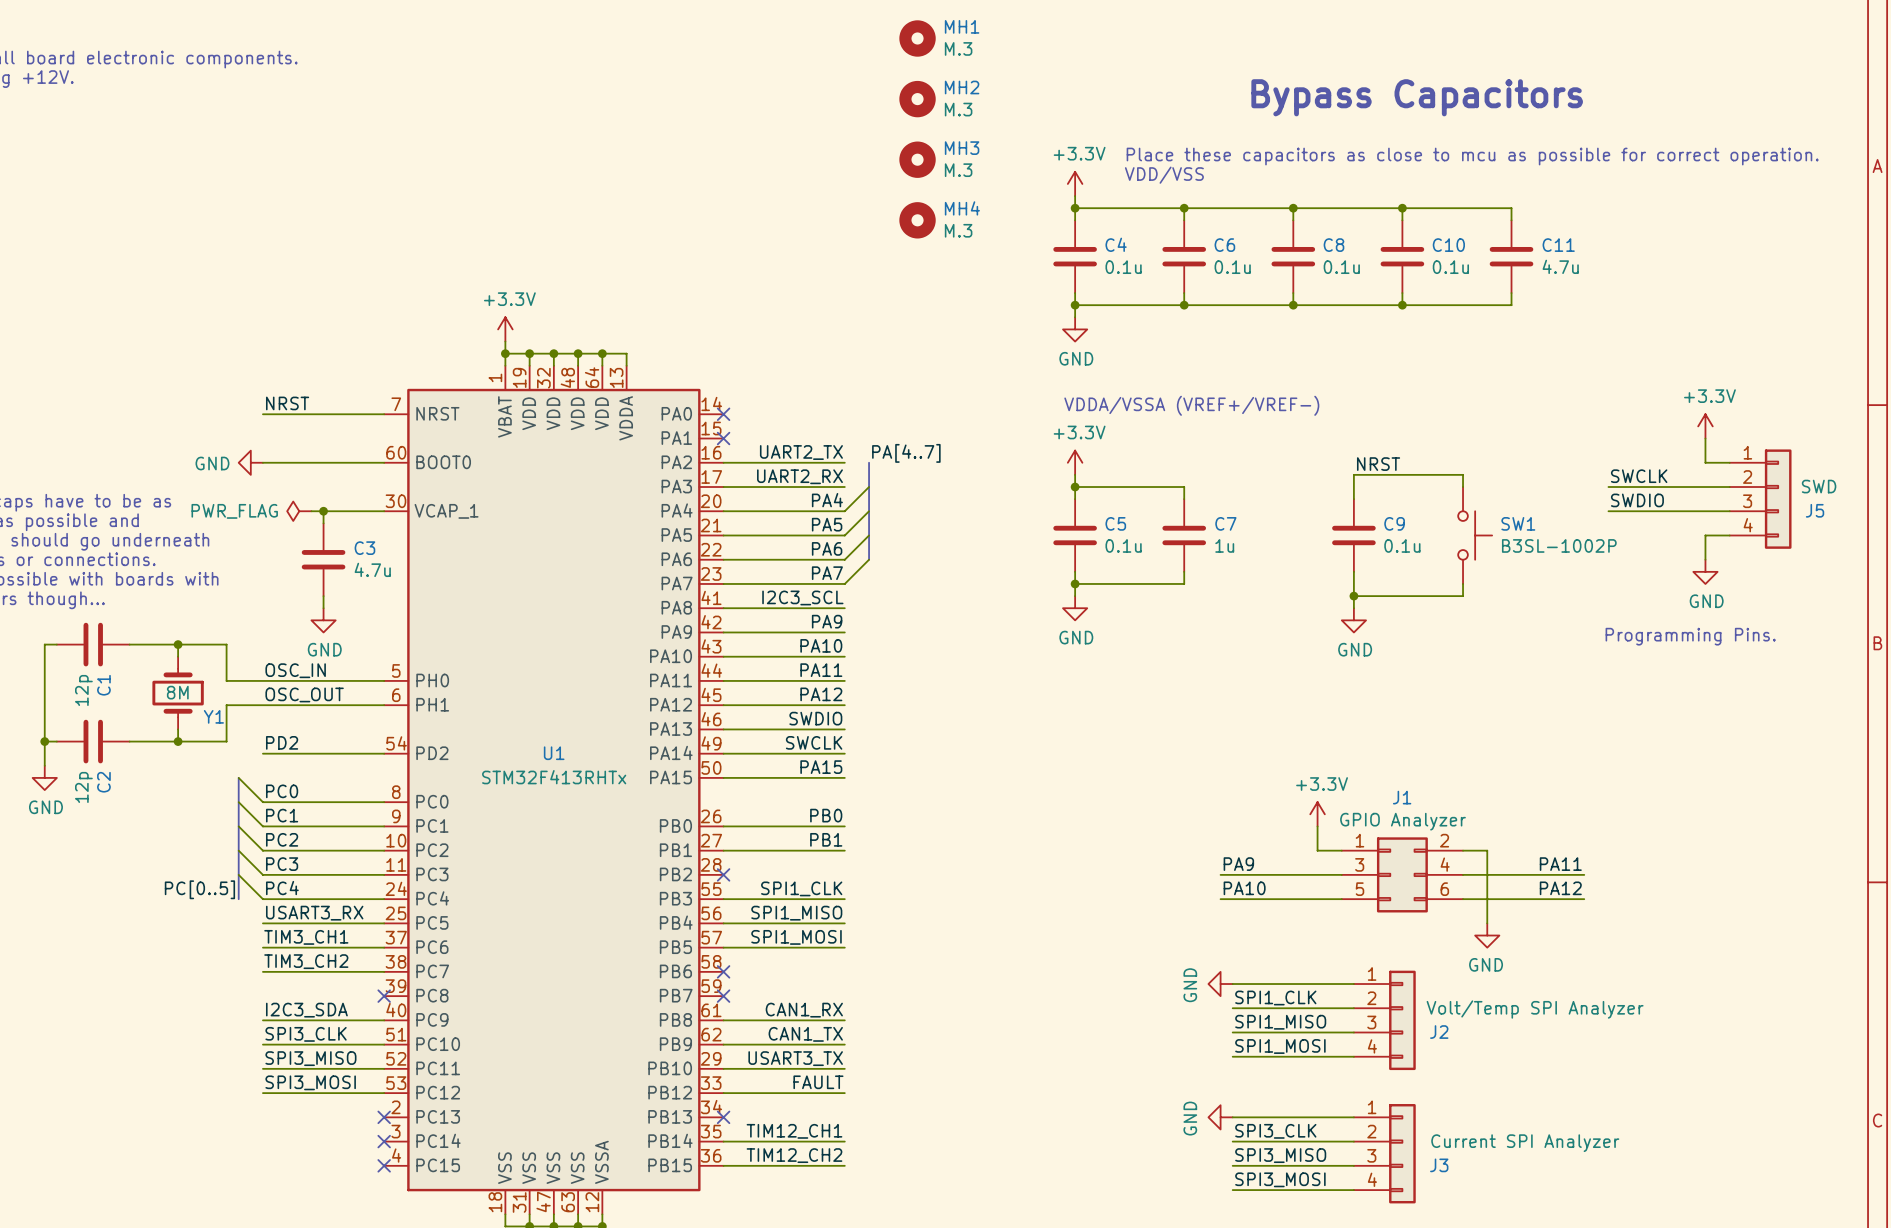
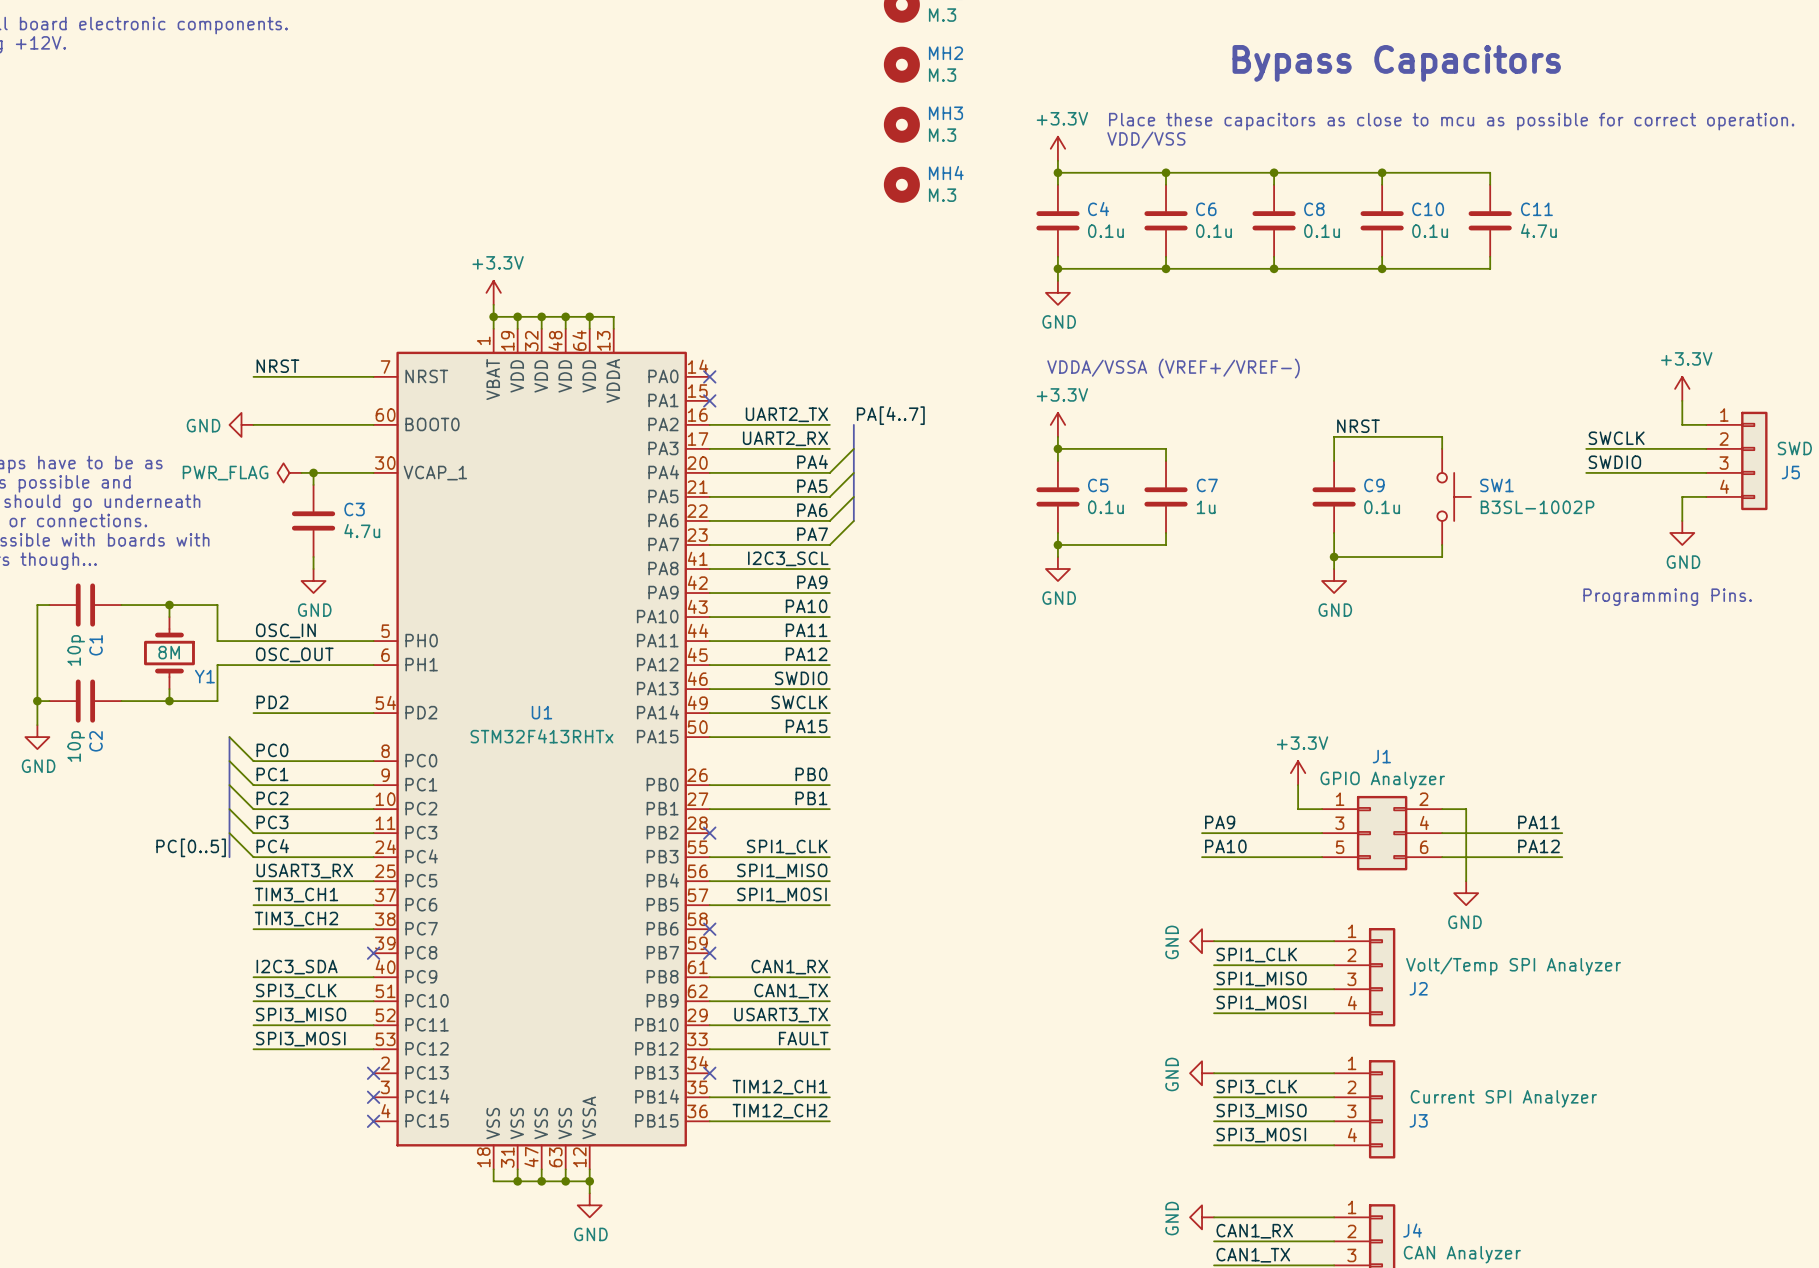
C1 value: 12p (83, 690) -> 10p (76, 650)
C2 value: 12p (83, 787) -> 10p (76, 746)

